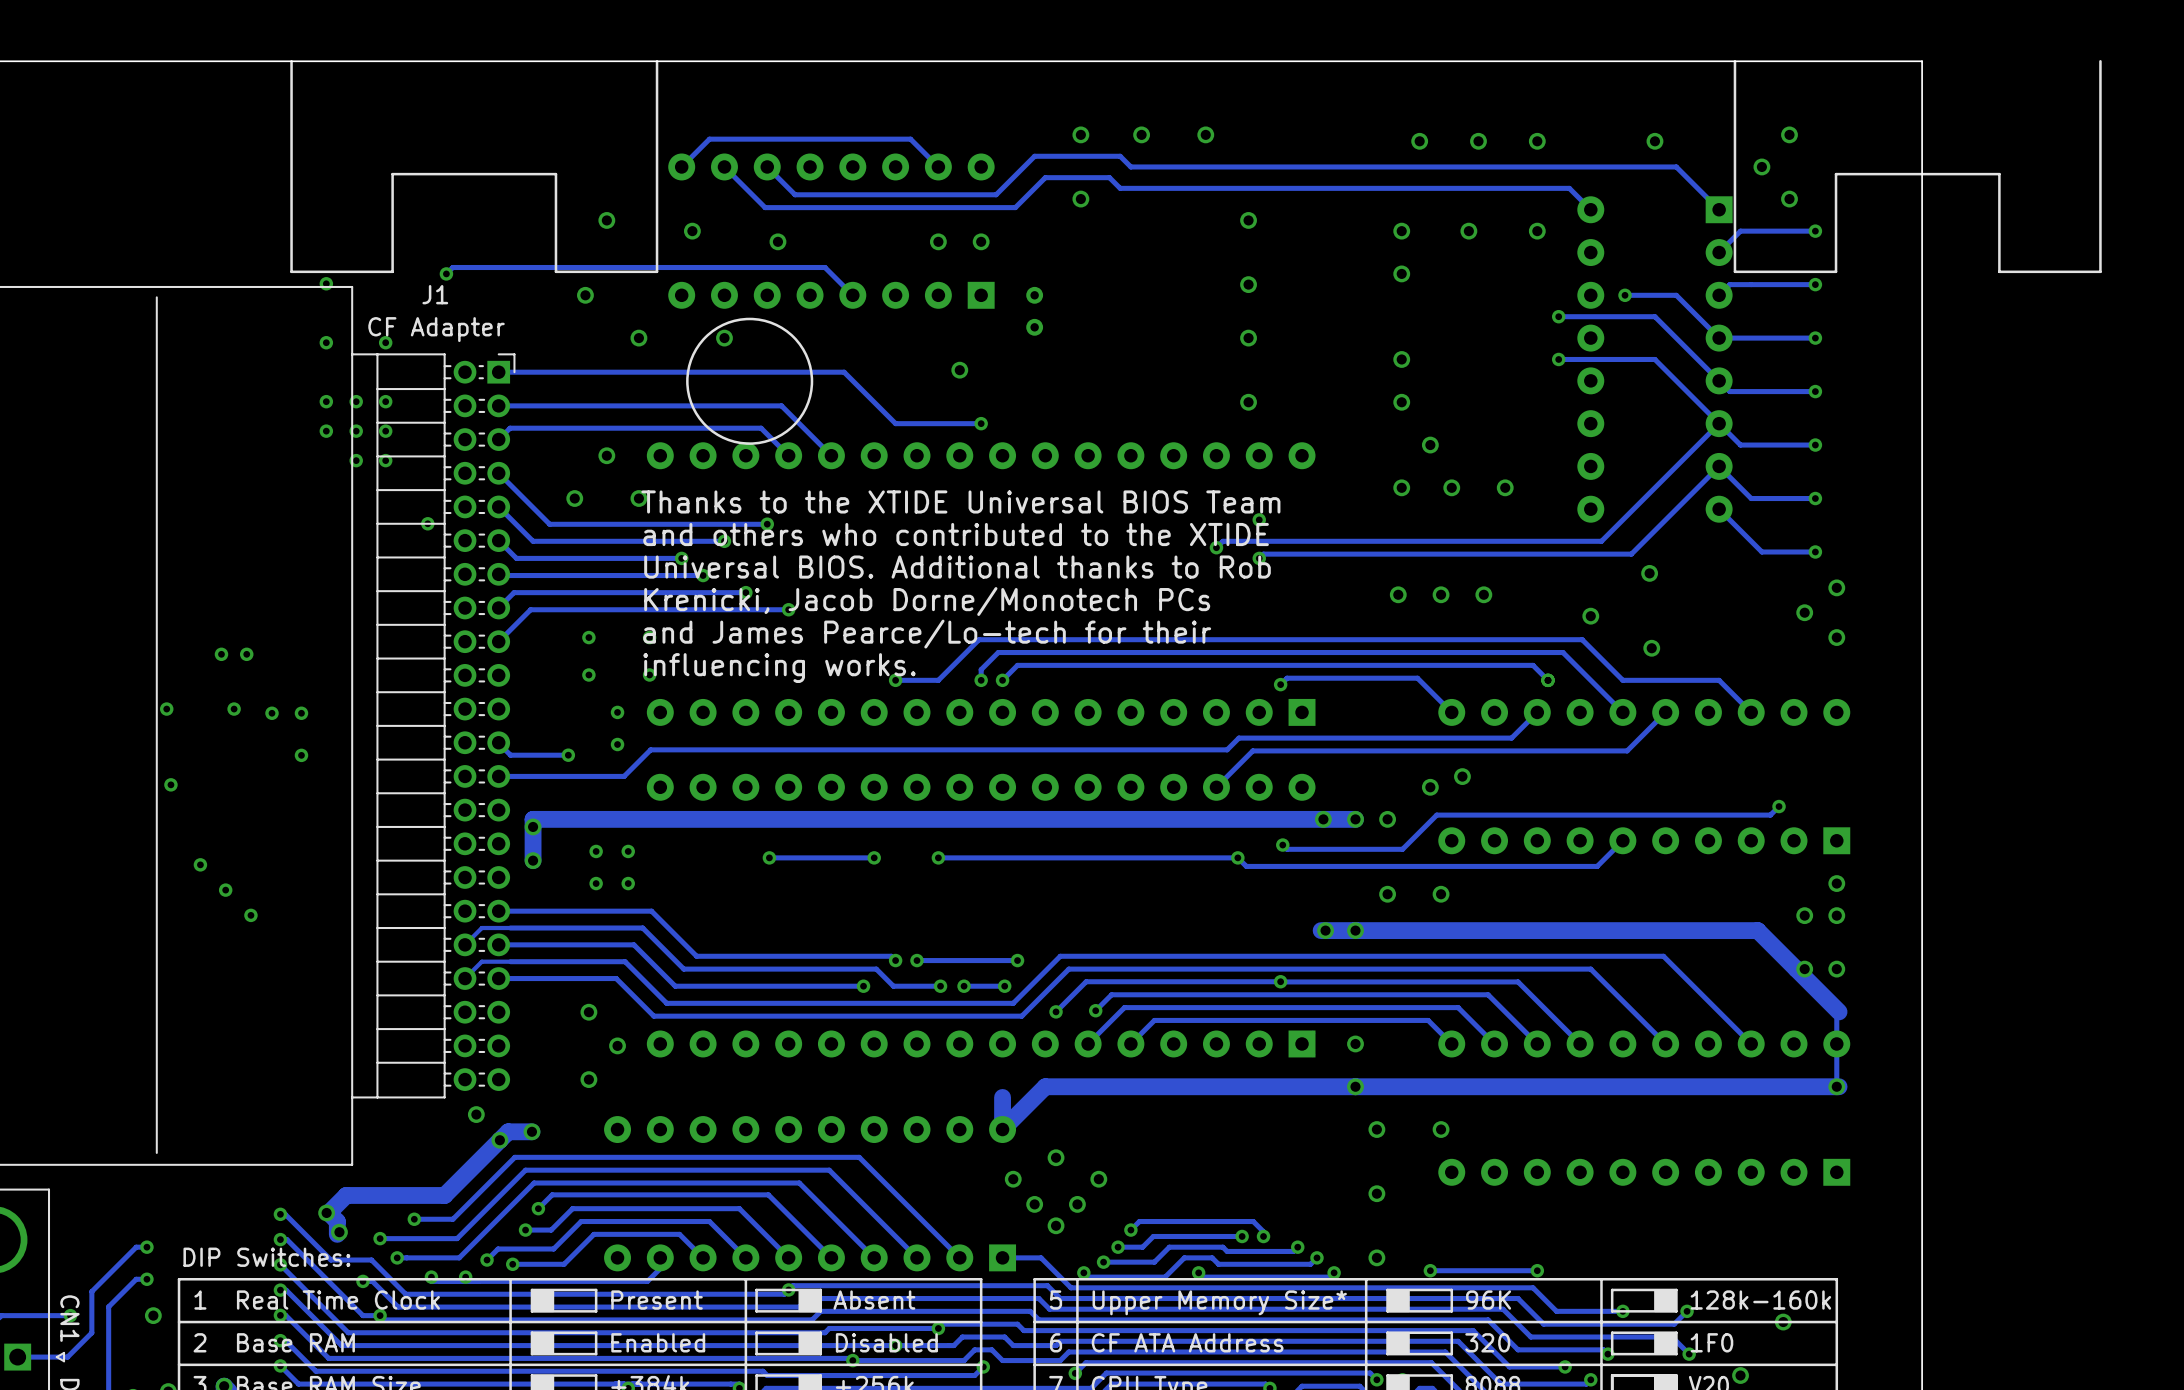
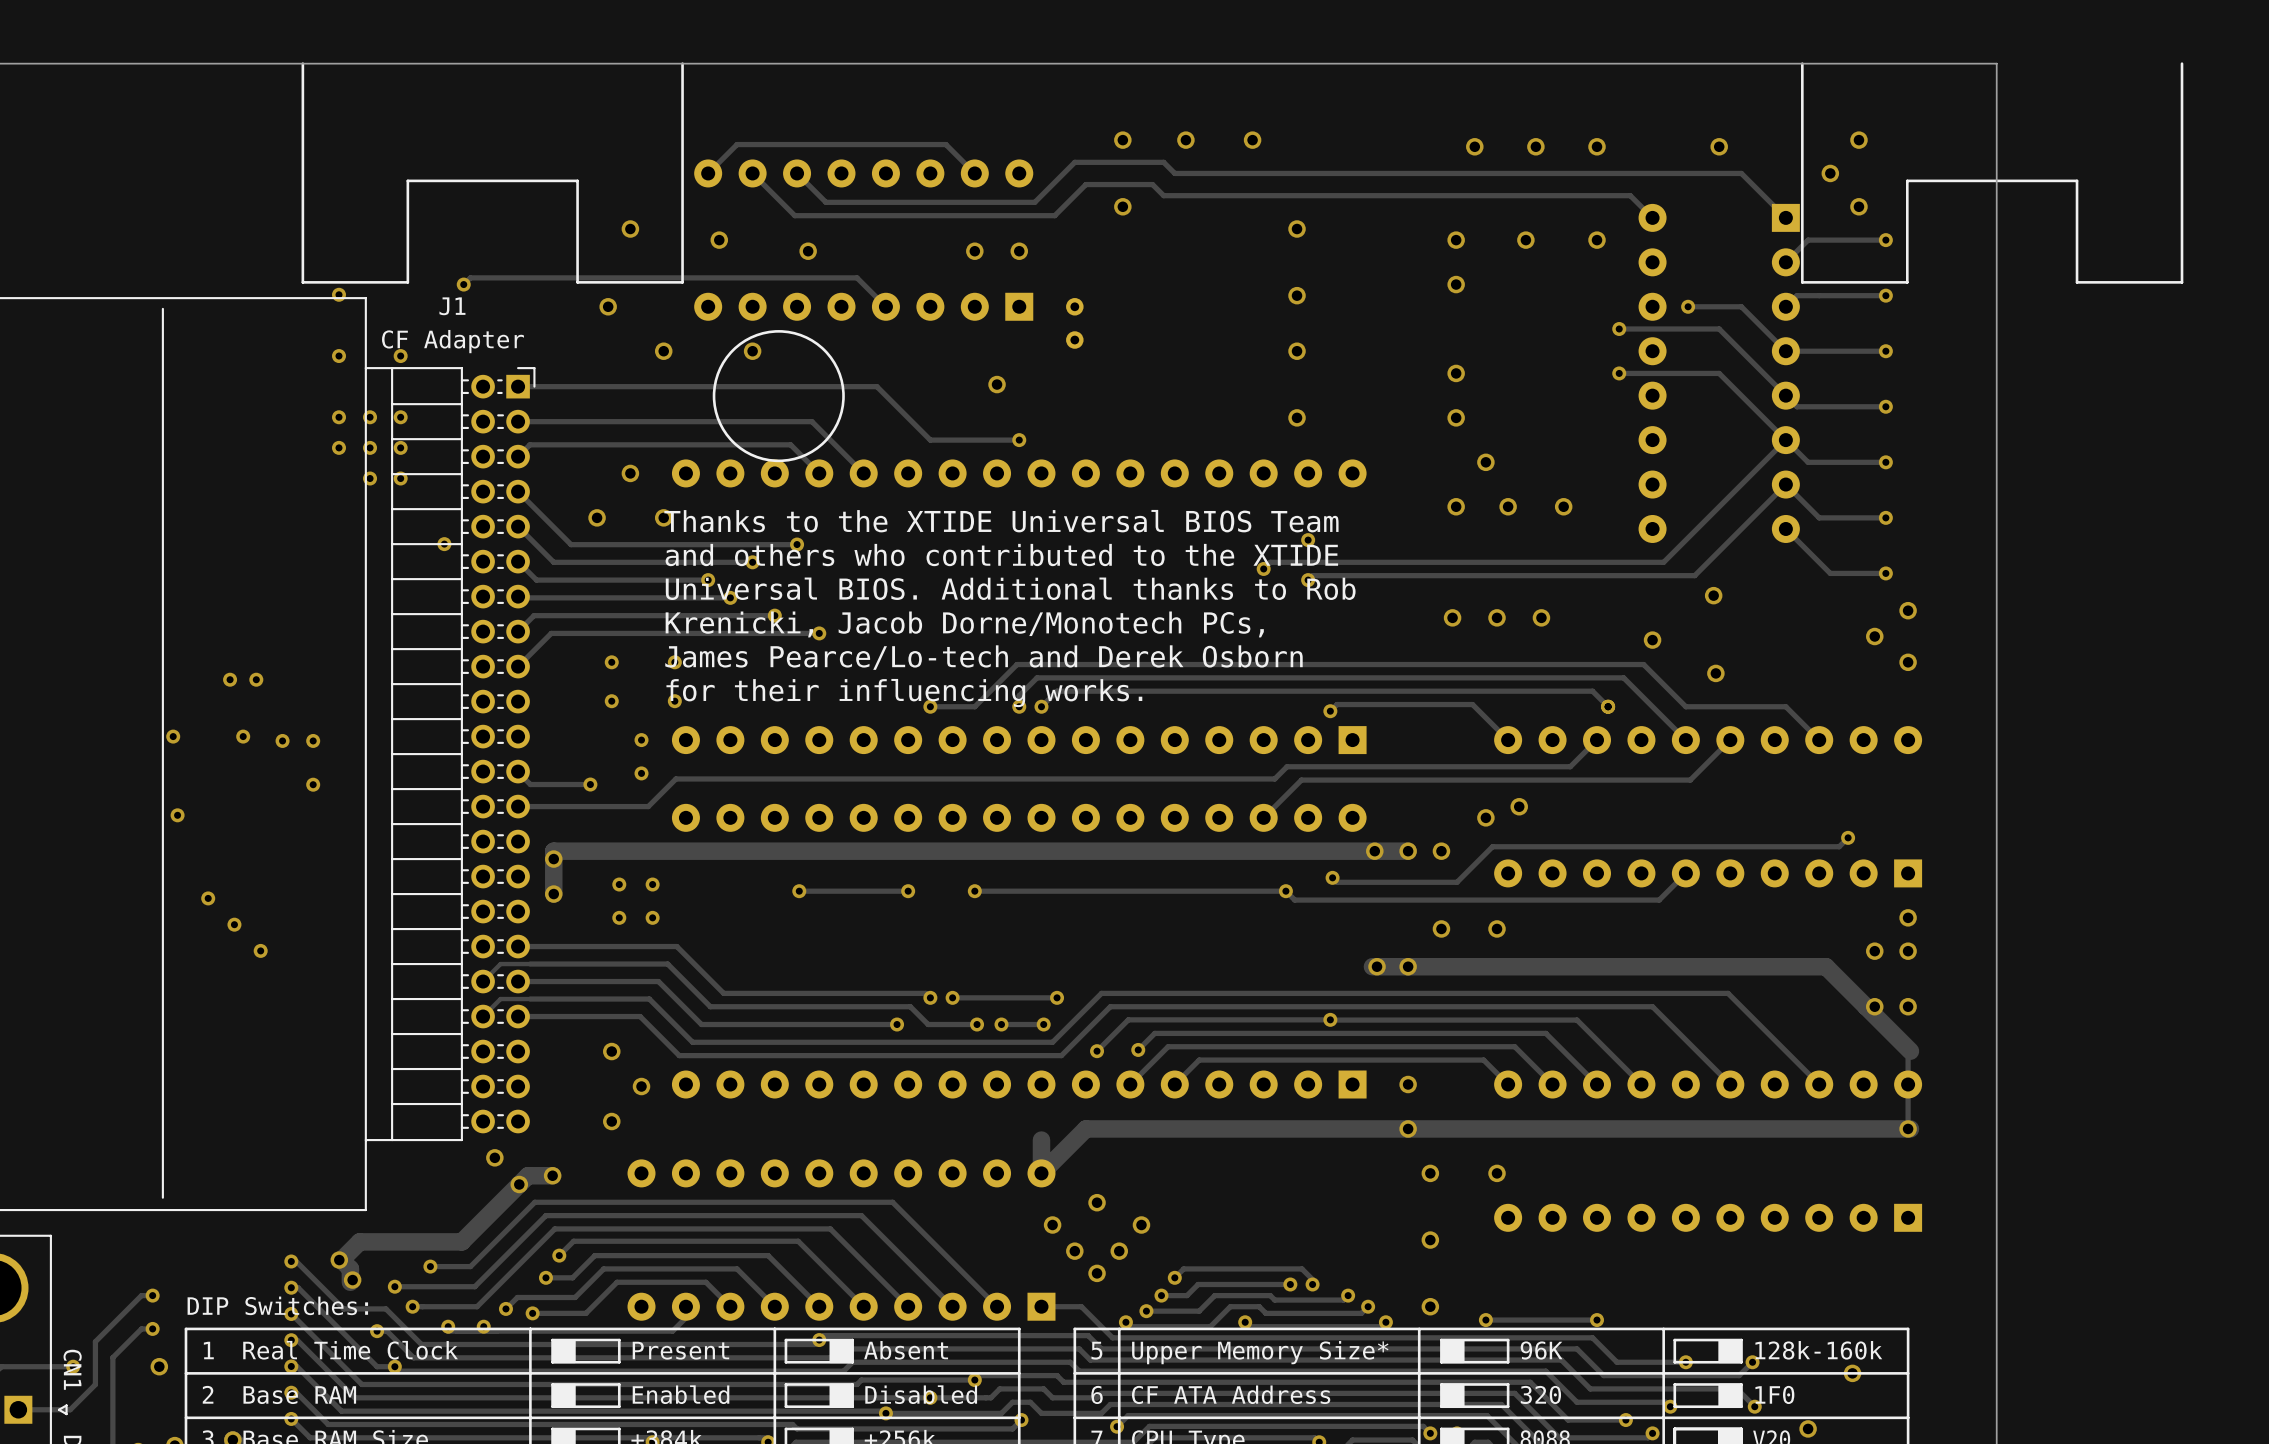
text: Krenicki, Jacob Dorne/Monotech PCs (927, 601) -> Krenicki, Jacob Dorne/Monotech PCs, (964, 624)
text: and James Pearce/Lo-tech for their (927, 634) -> James Pearce/Lo-tech and Derek Osborn (983, 657)
text: influencing works. (779, 668) -> for their influencing works. (904, 693)

